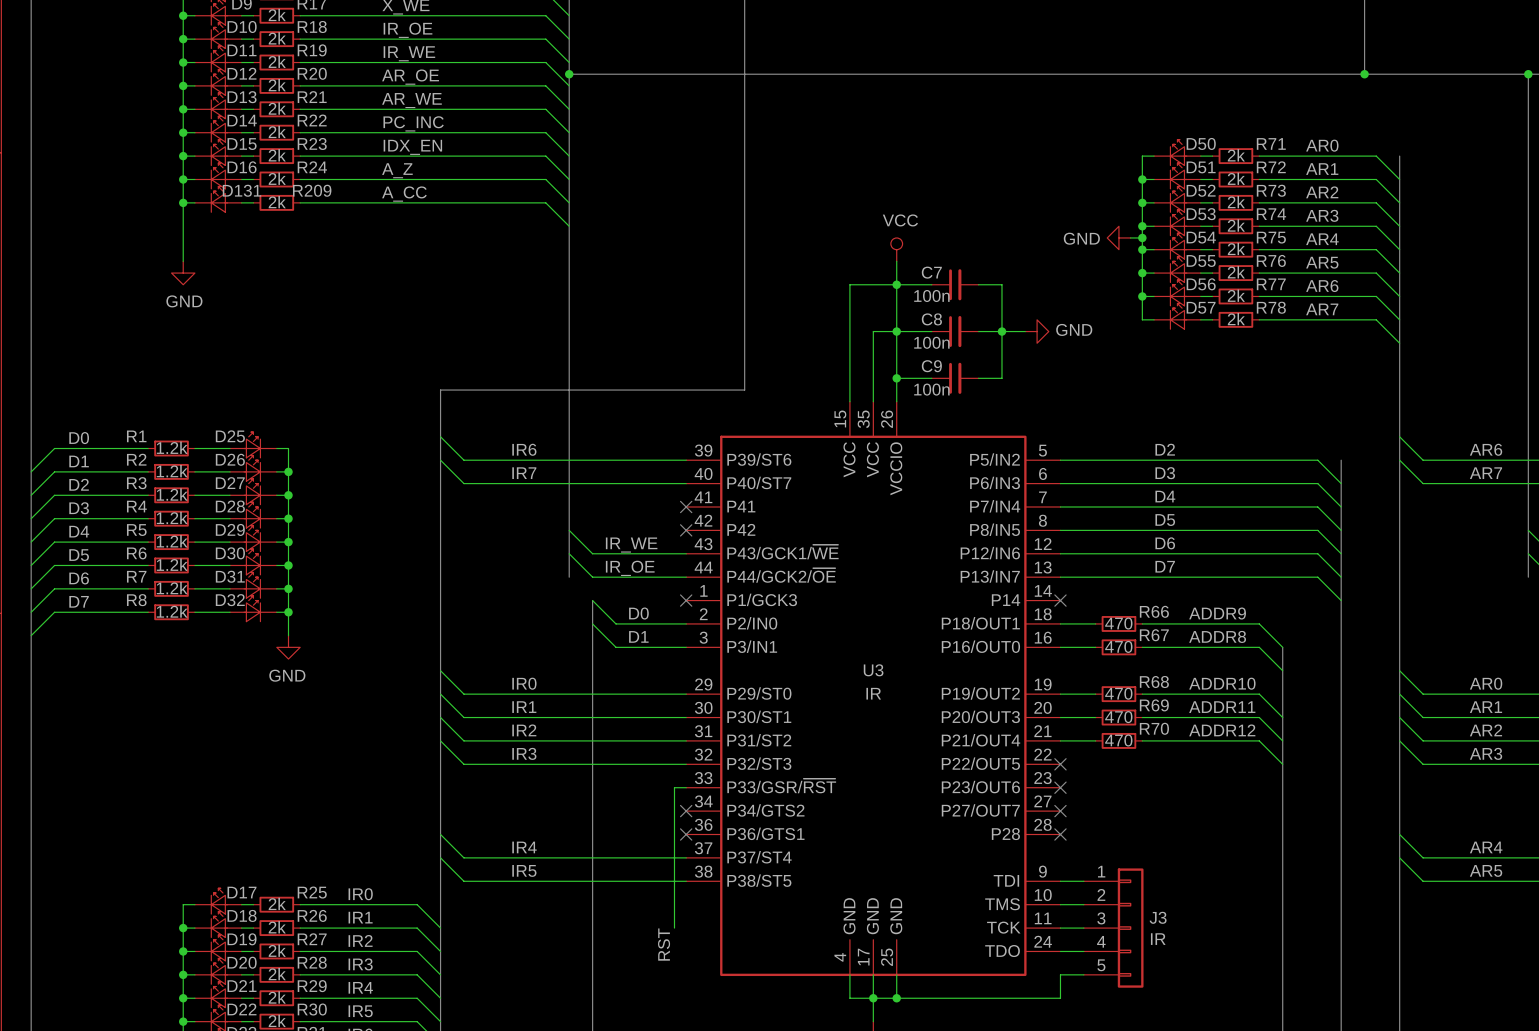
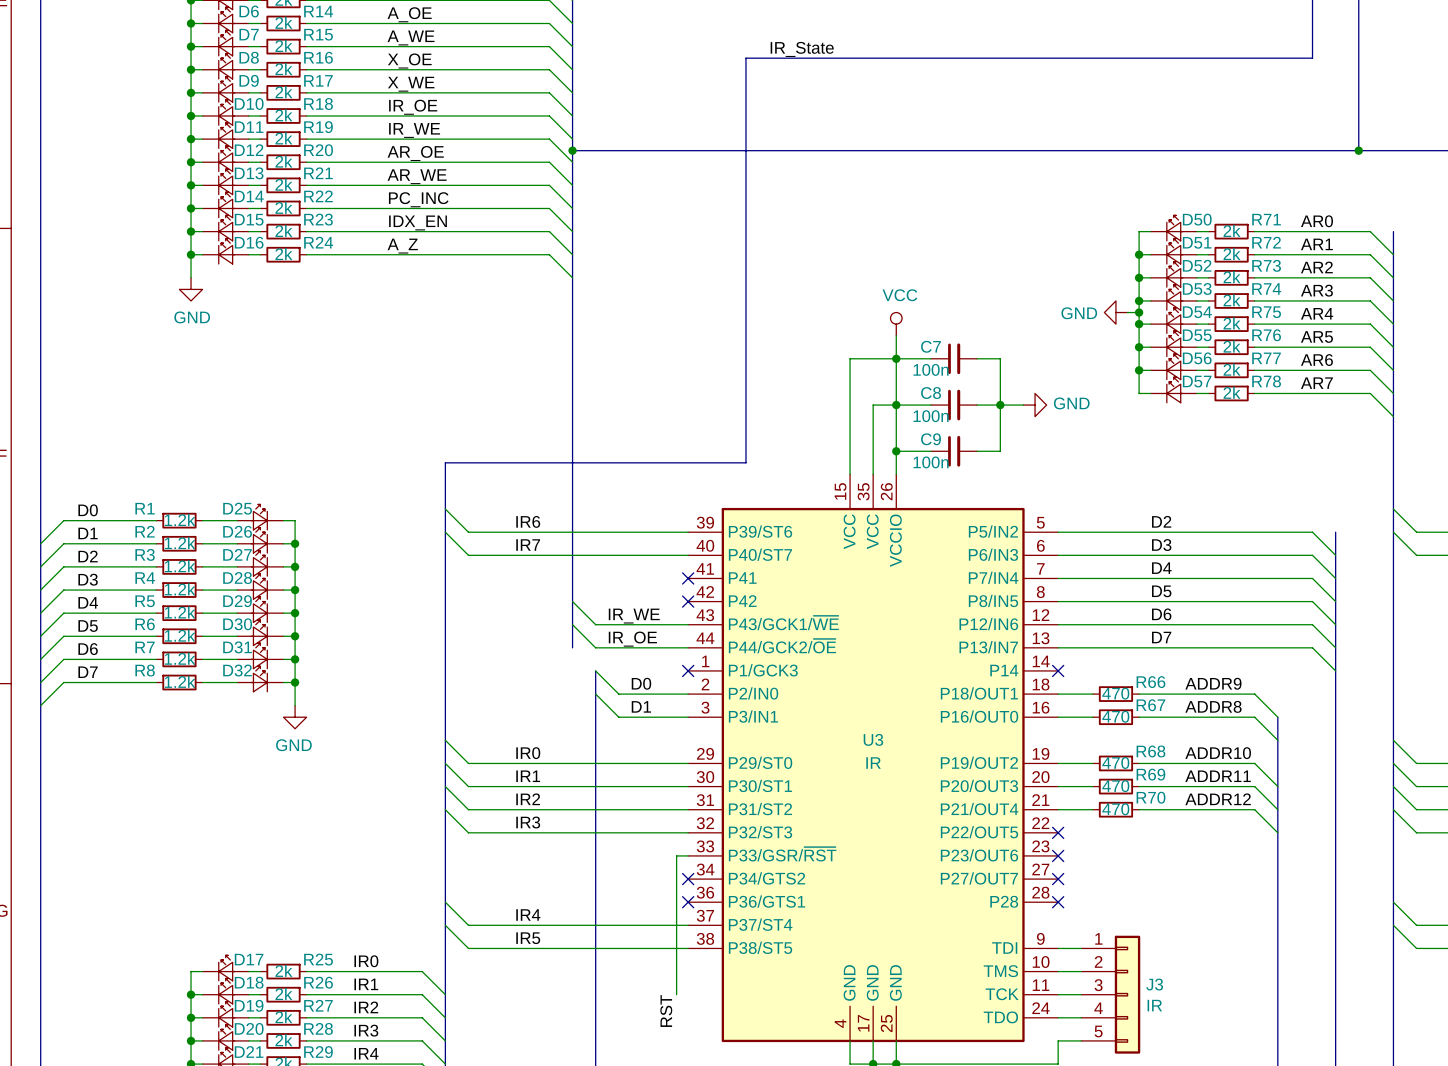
label: A_CC (404, 194) -> none
D131: (218, 199) -> none
junction: (183, 202) -> none
wire: (194, 202) (183, 202) (183, 261) -> none
wire: (241, 202) (253, 202) -> none
R209: 2k (276, 202) -> none
wire: (300, 202) (545, 202) (569, 226) -> none
power symbol position: GND (183, 273) -> GND (191, 289)

